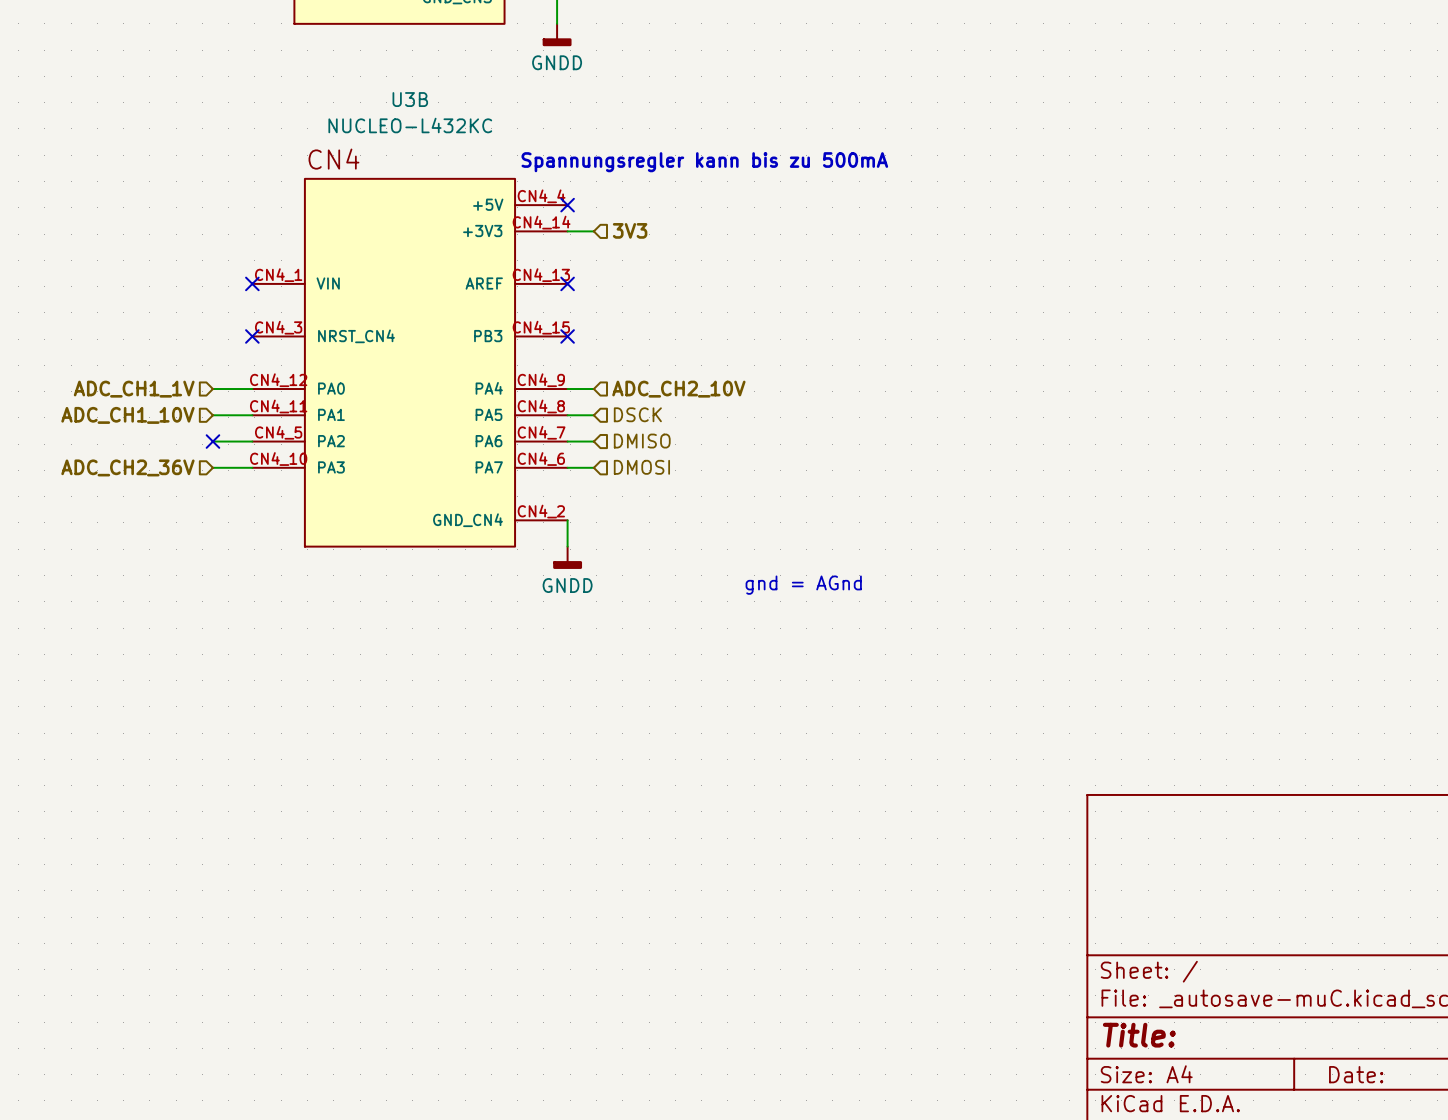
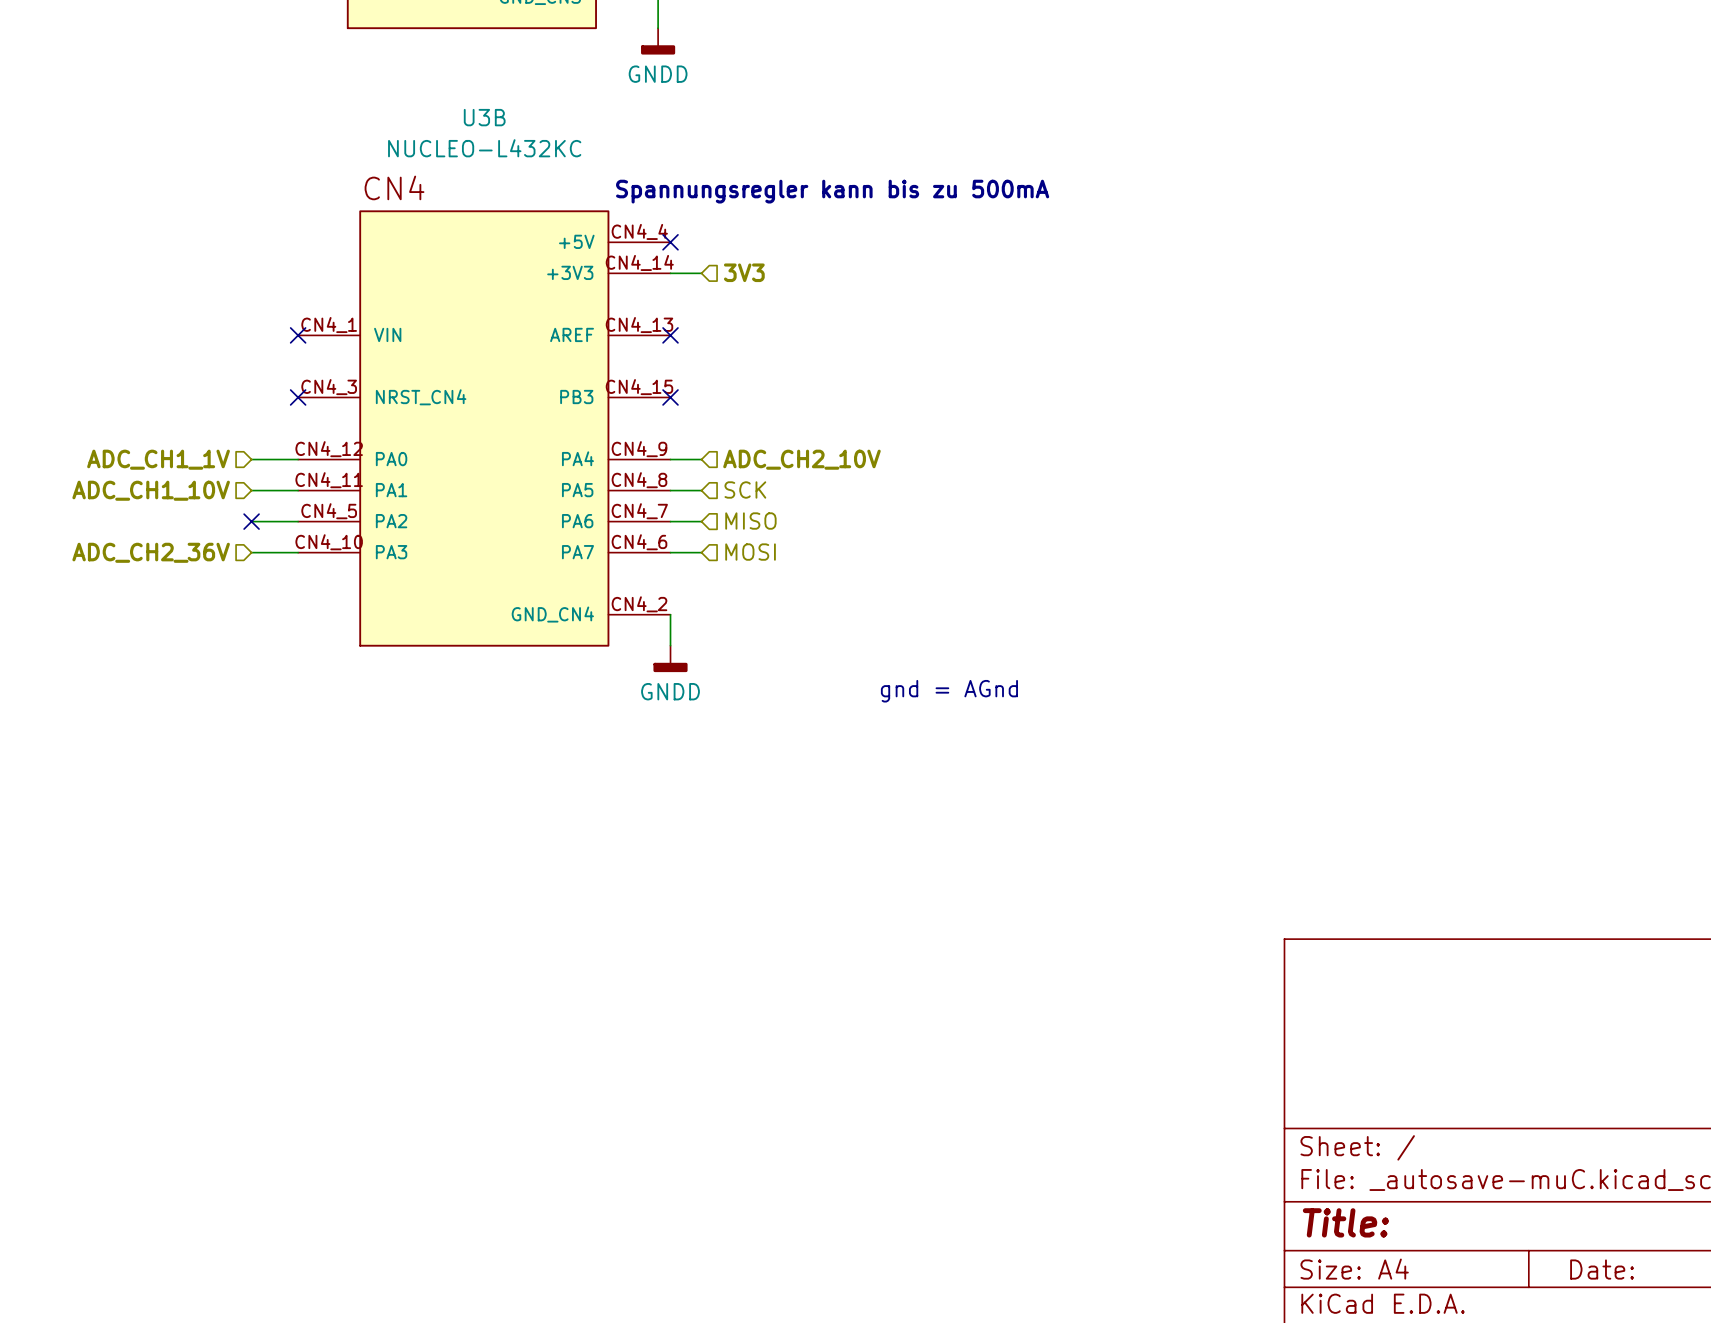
hierarchical label: DSCK (637, 414) -> SCK (745, 489)
hierarchical label: DMISO (642, 441) -> MISO (750, 521)
hierarchical label: DMOSI (641, 467) -> MOSI (750, 552)

